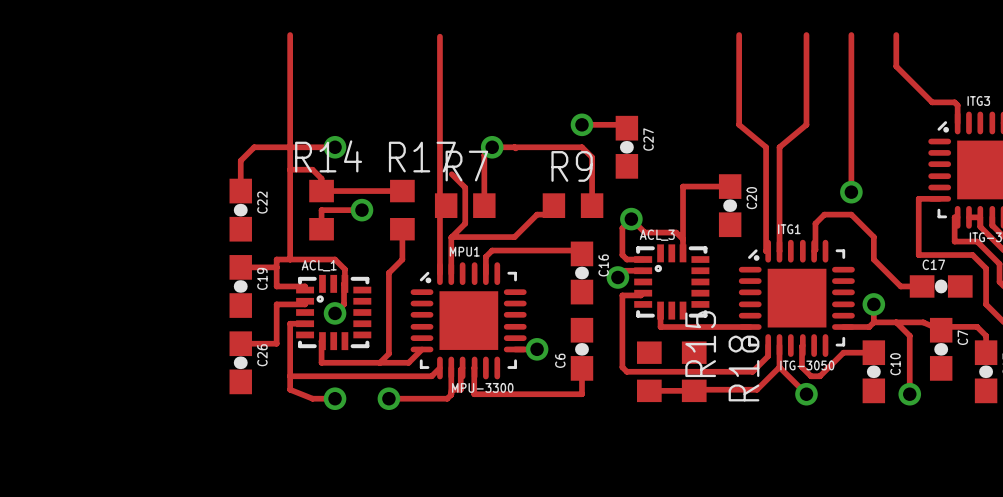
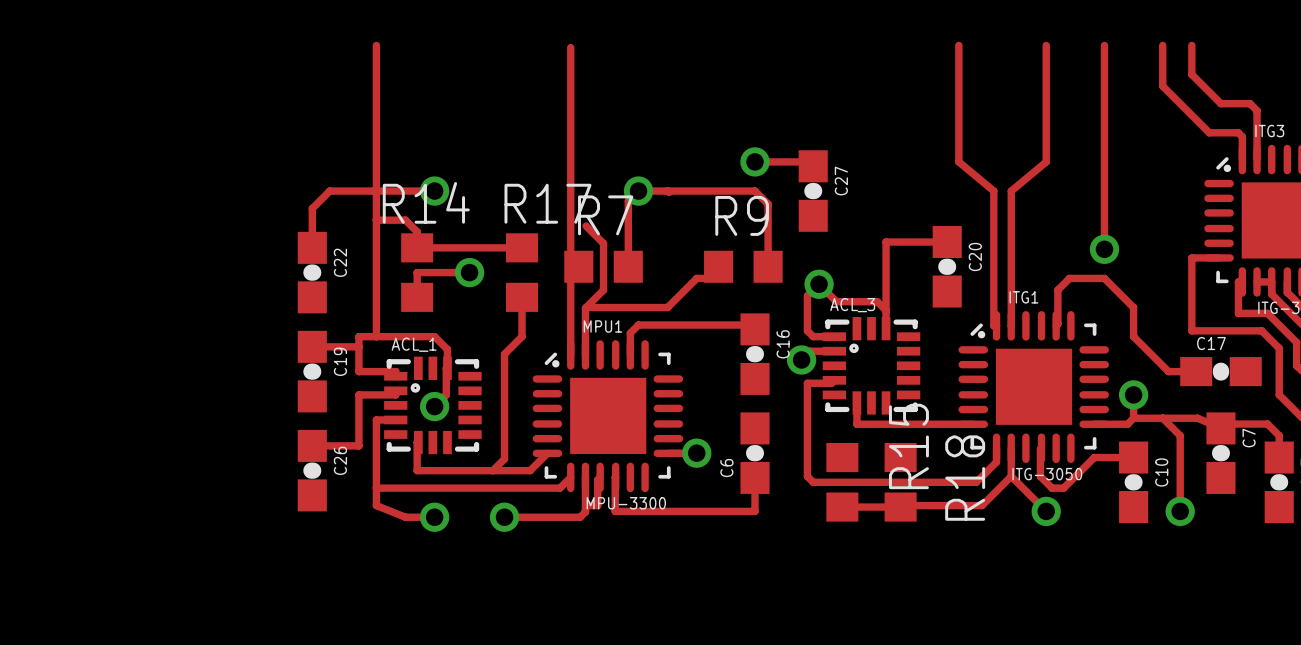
track: none -> (1191, 45) (1191, 74) (1220, 103) (1250, 103) (1257, 110) (1257, 159)

